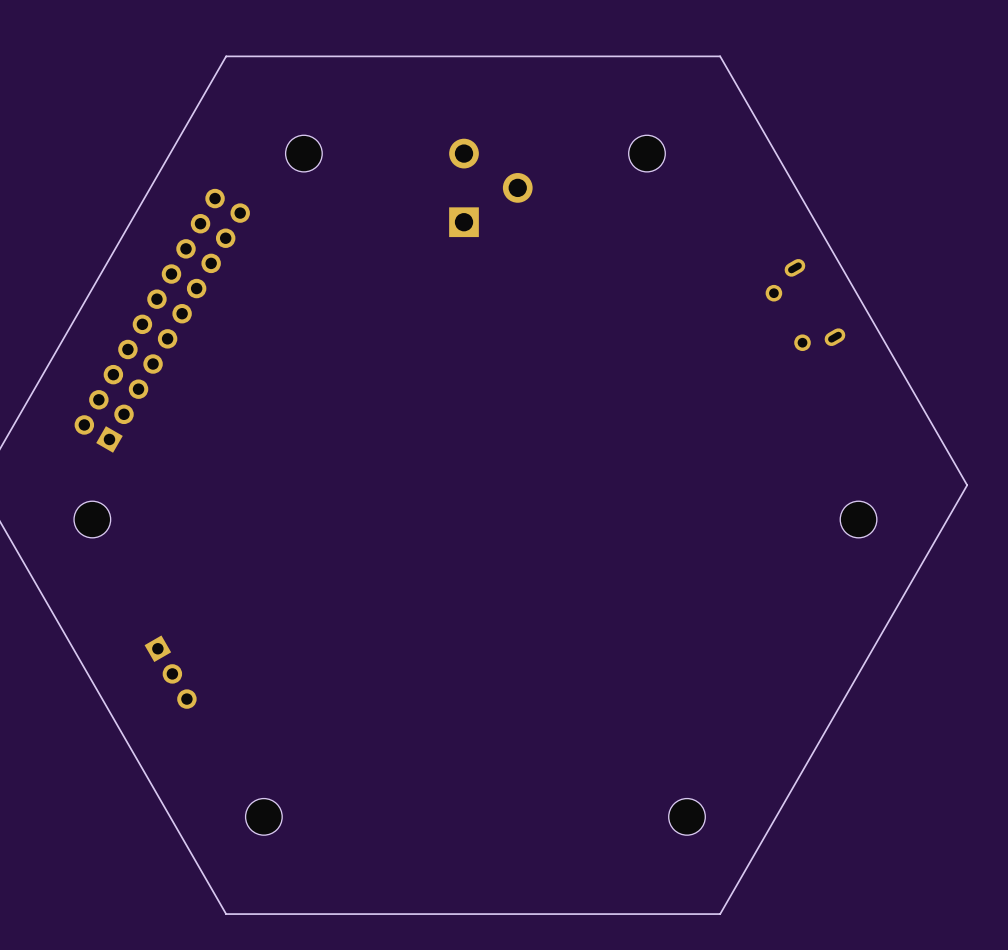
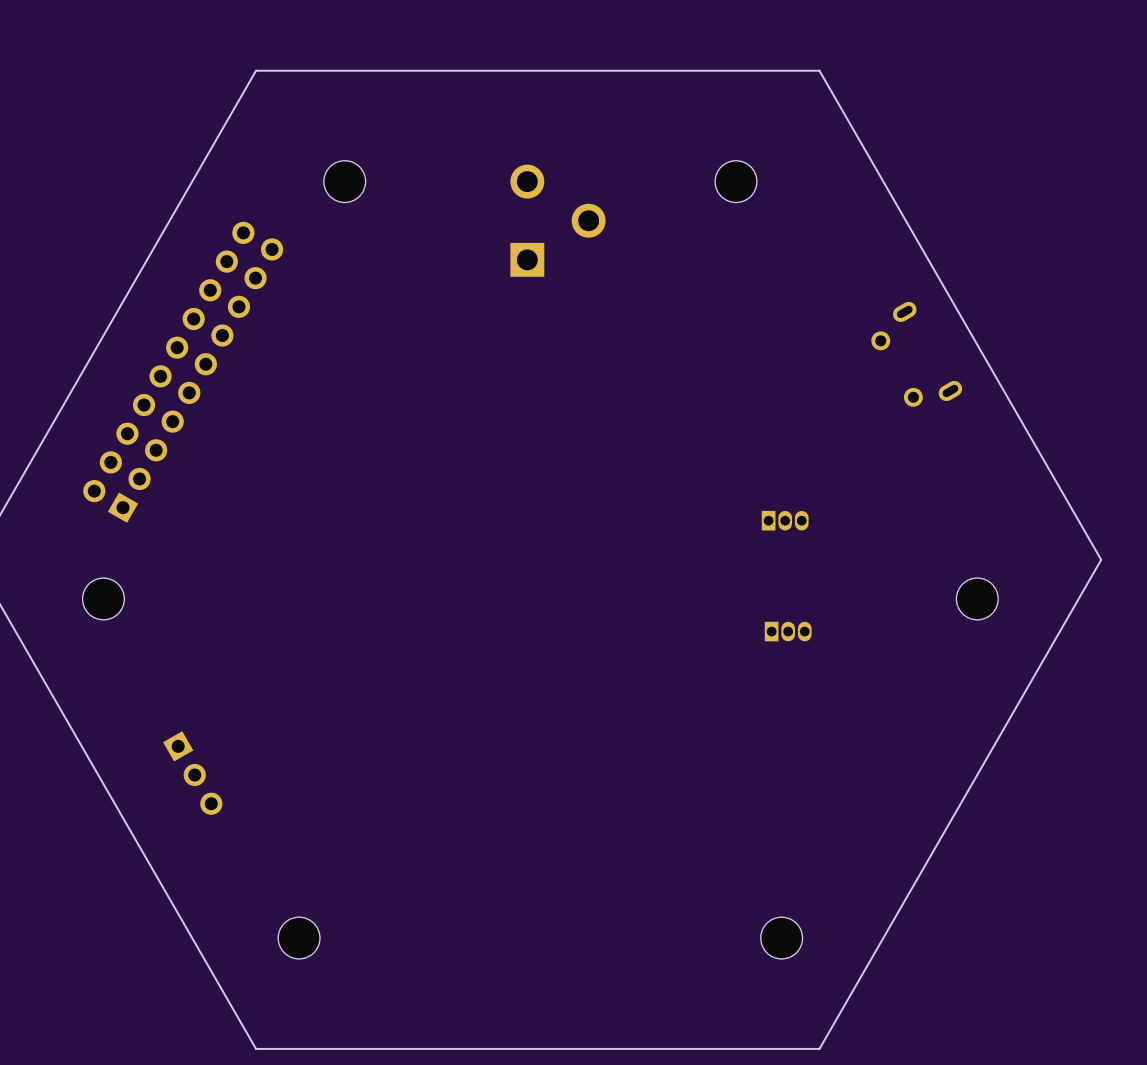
part: none -> (785, 520)
part: none -> (788, 631)

